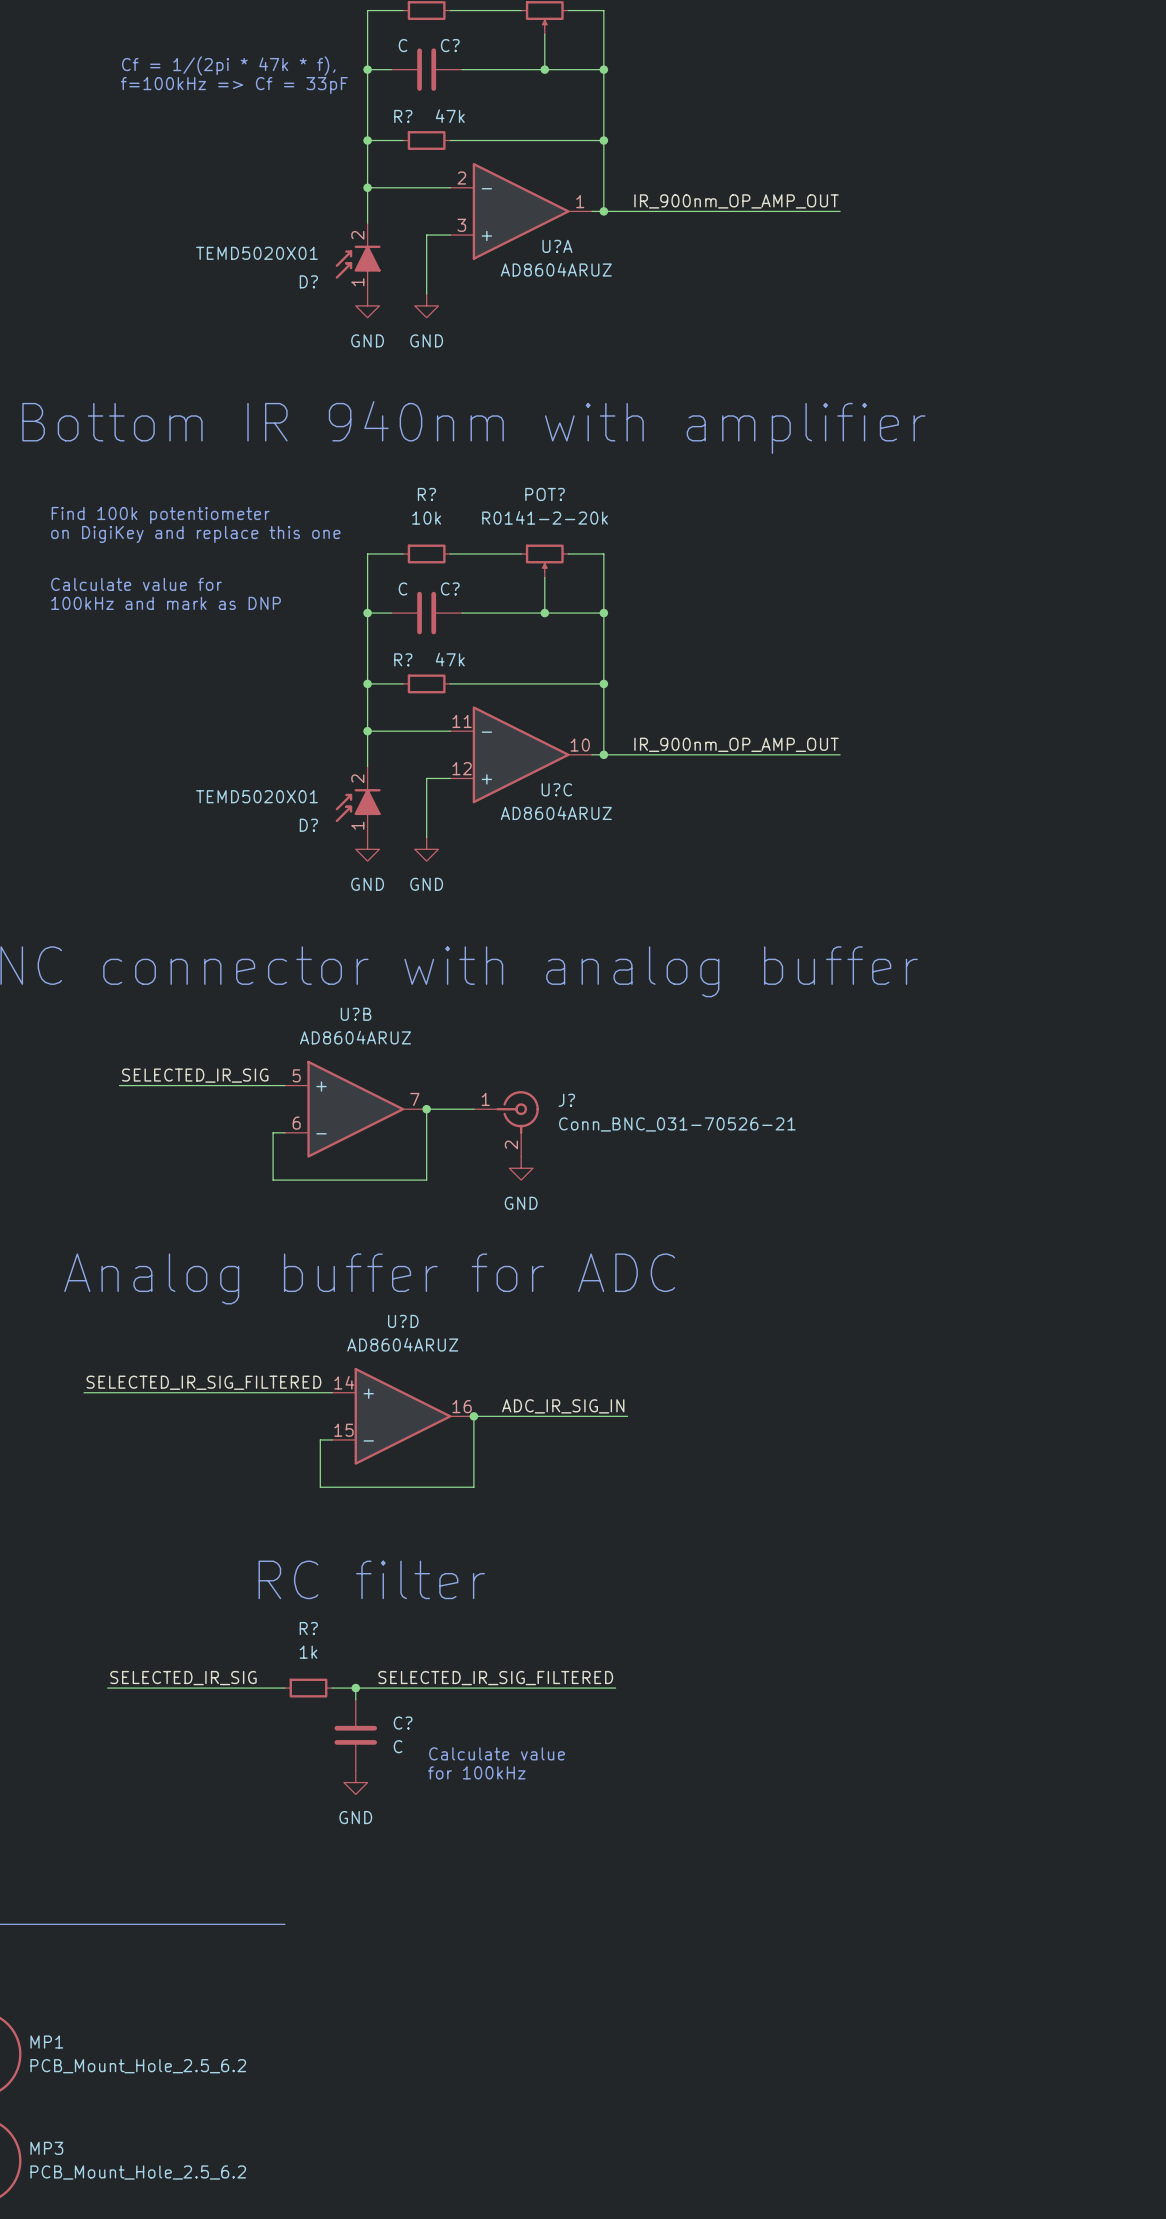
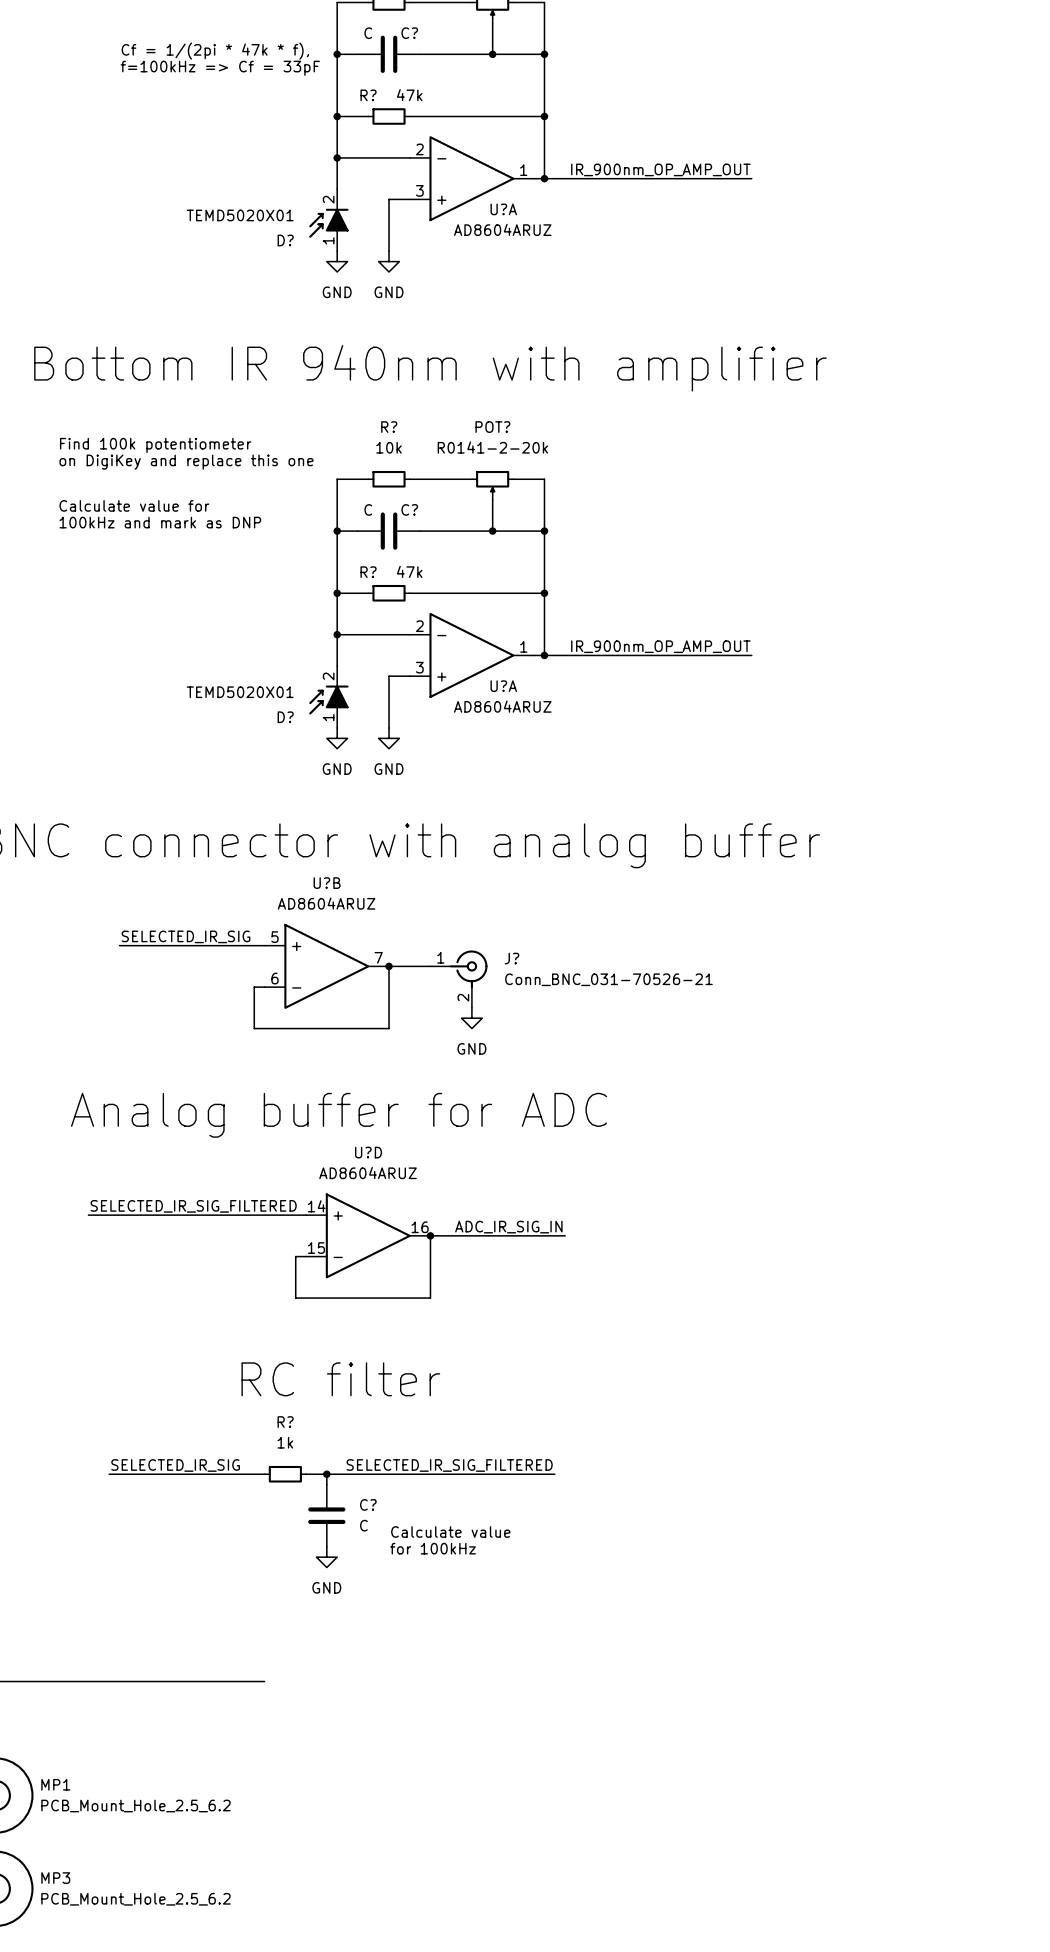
U?C pin number: 11 (462, 721) -> 2 (419, 626)
U?C pin number: 10 (580, 745) -> 1 (523, 646)
U?C pin number: 12 (462, 768) -> 3 (419, 667)
U?C name: U?C (556, 789) -> U?A (503, 686)

